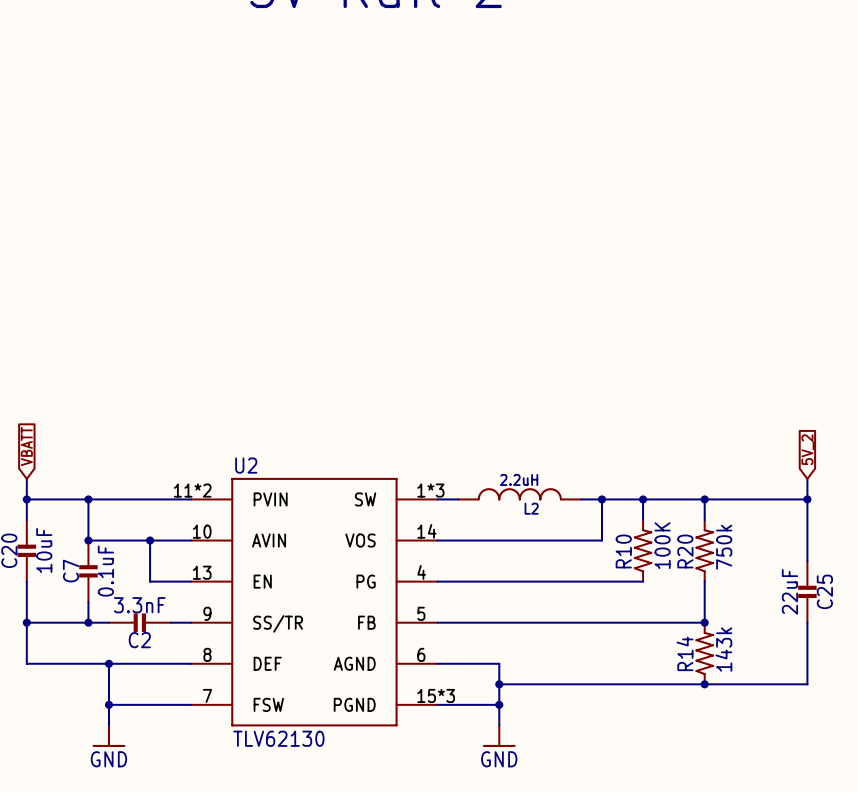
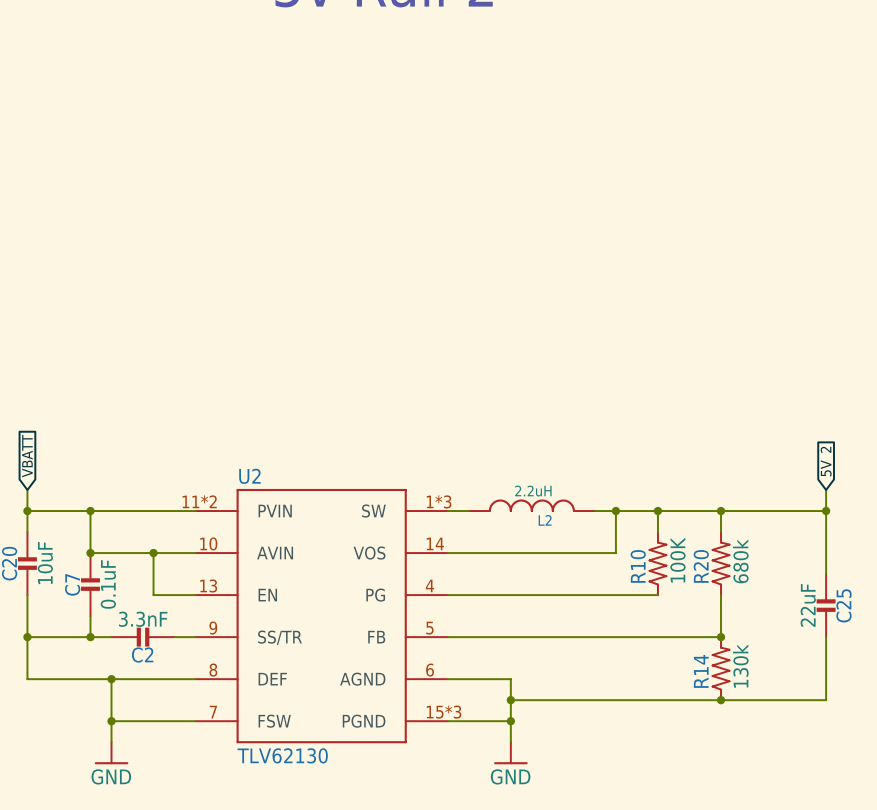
R20 value: 750k (724, 547) -> 680k (740, 561)
R14 value: 143k (723, 649) -> 130k (740, 666)

